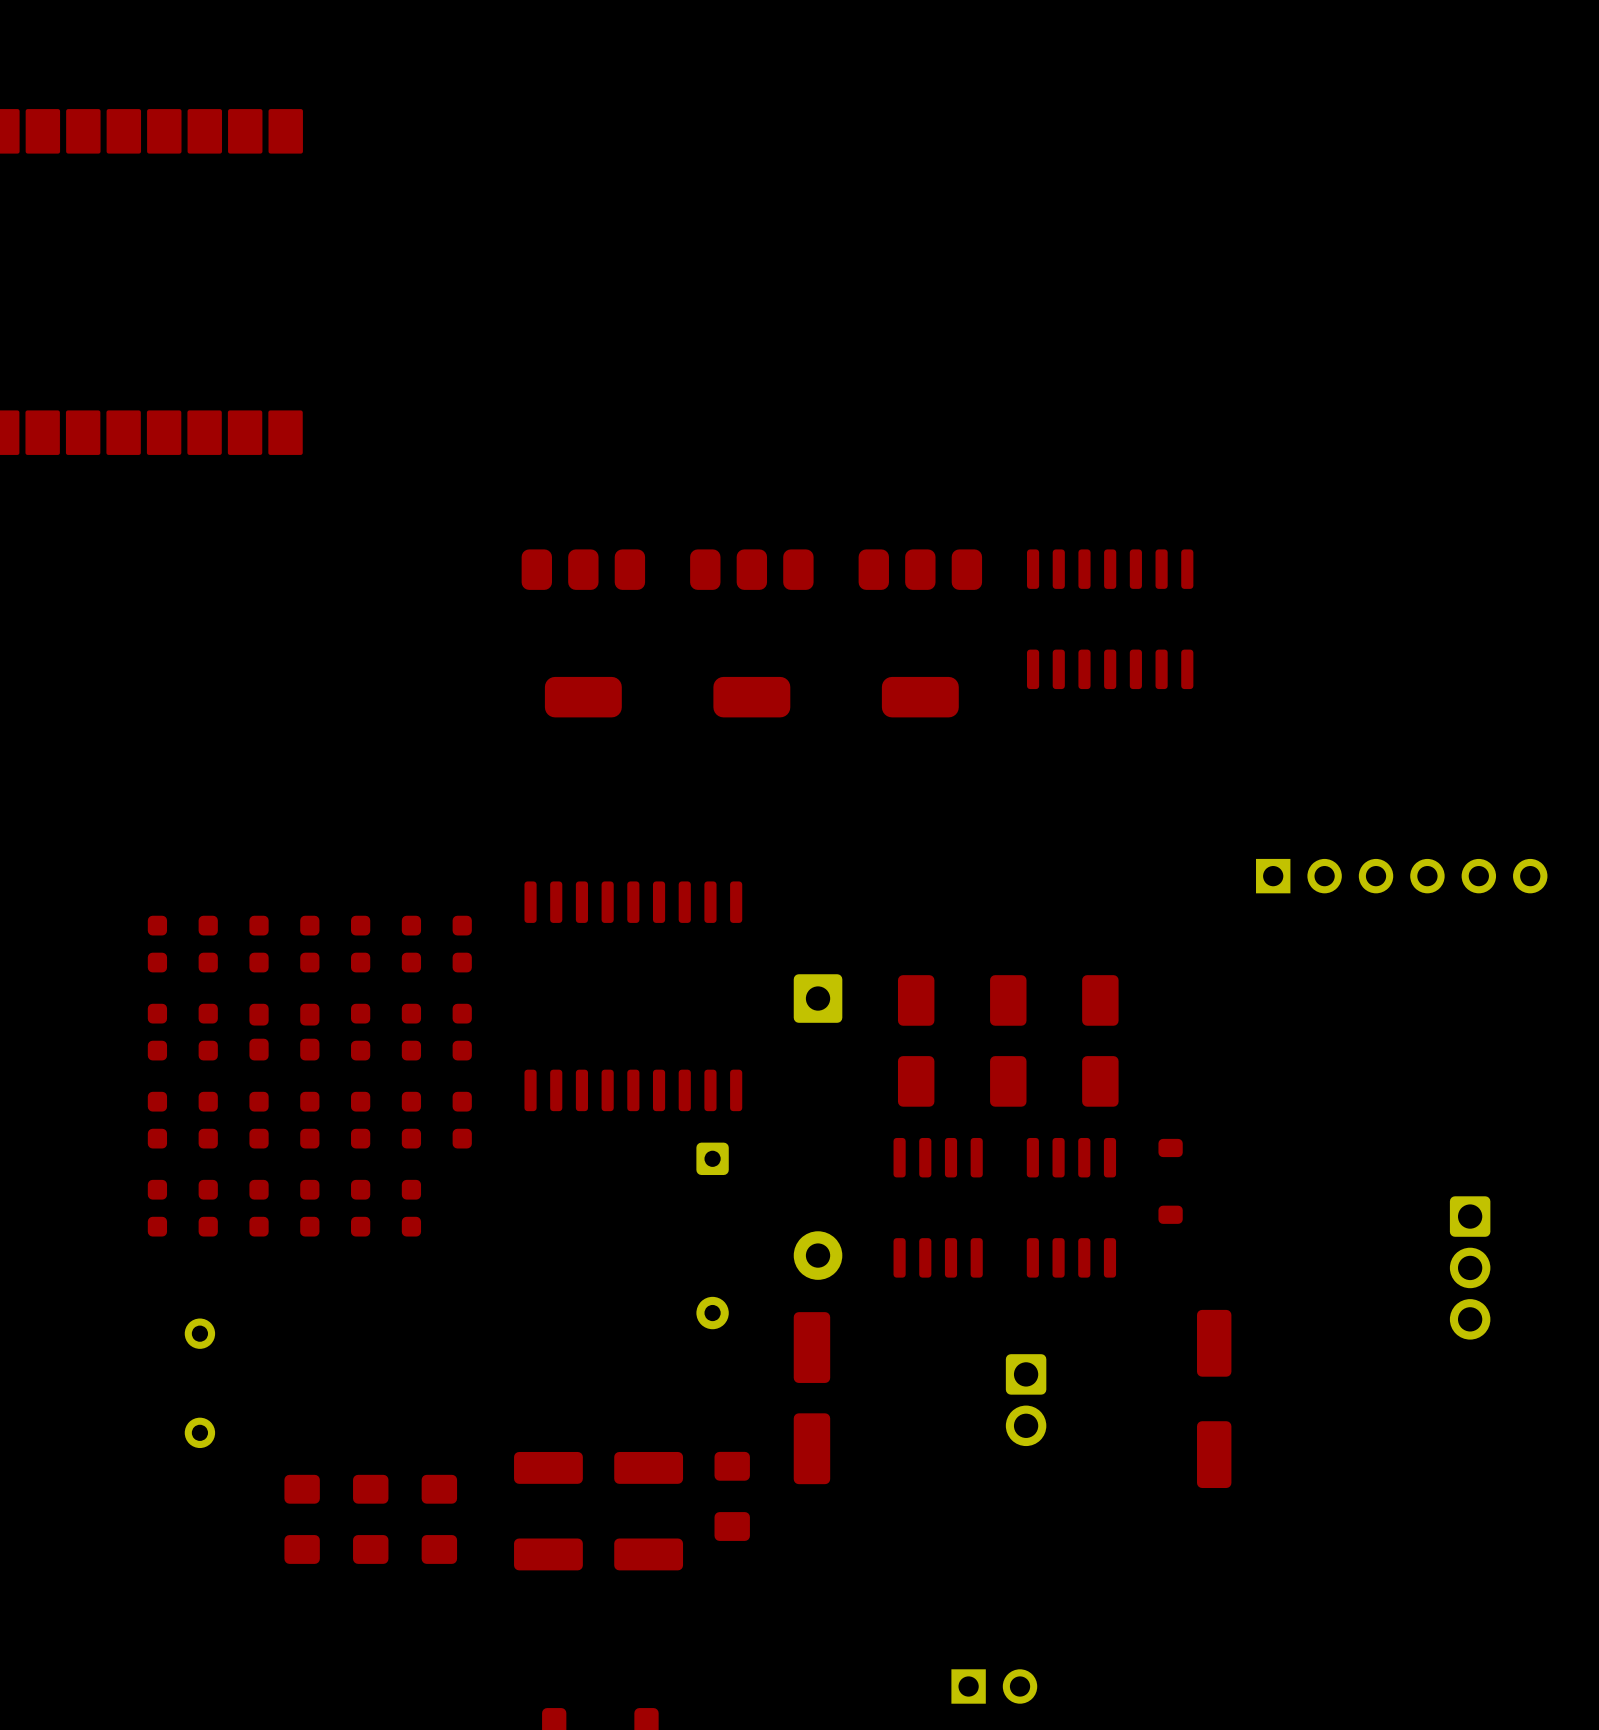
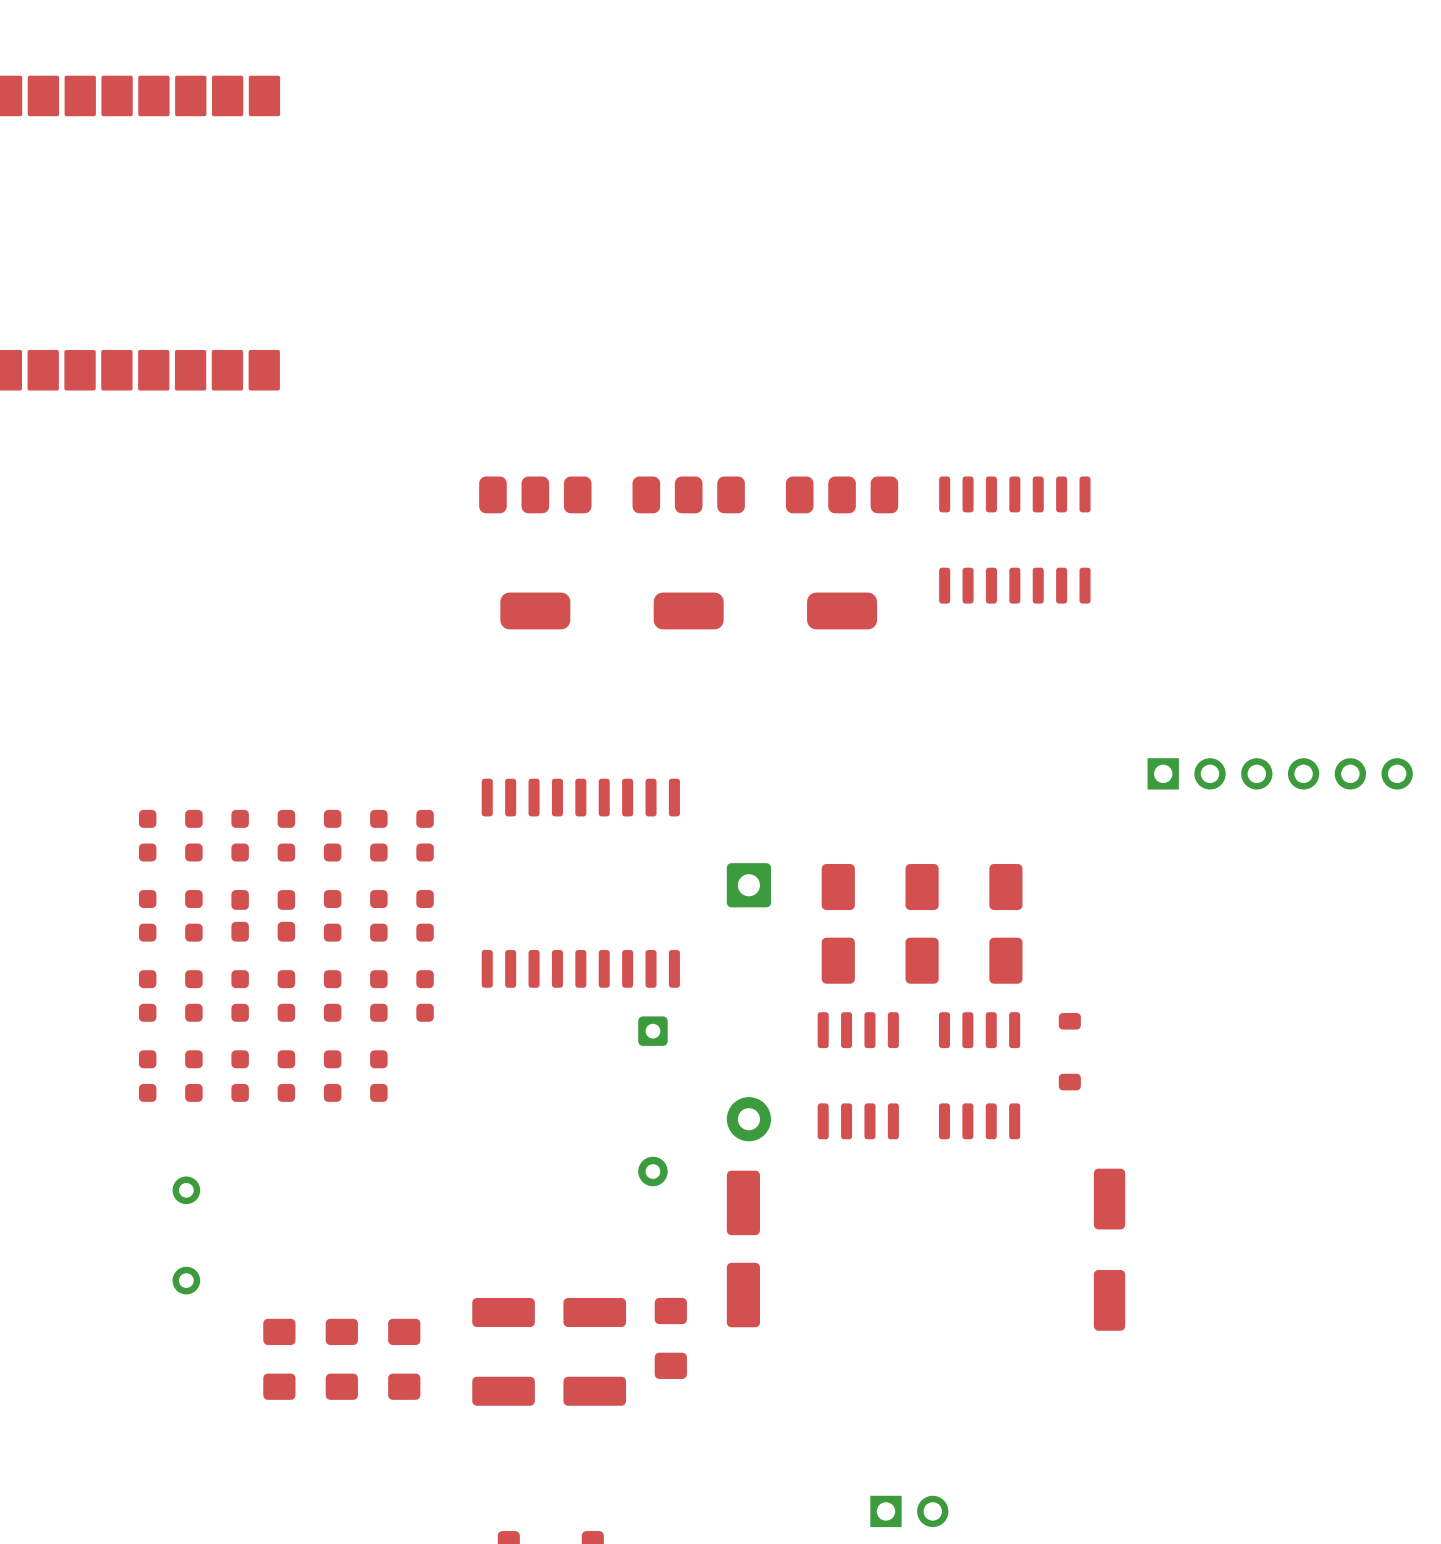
part: (1470, 1267) -> none
part: (1026, 1400) -> none

